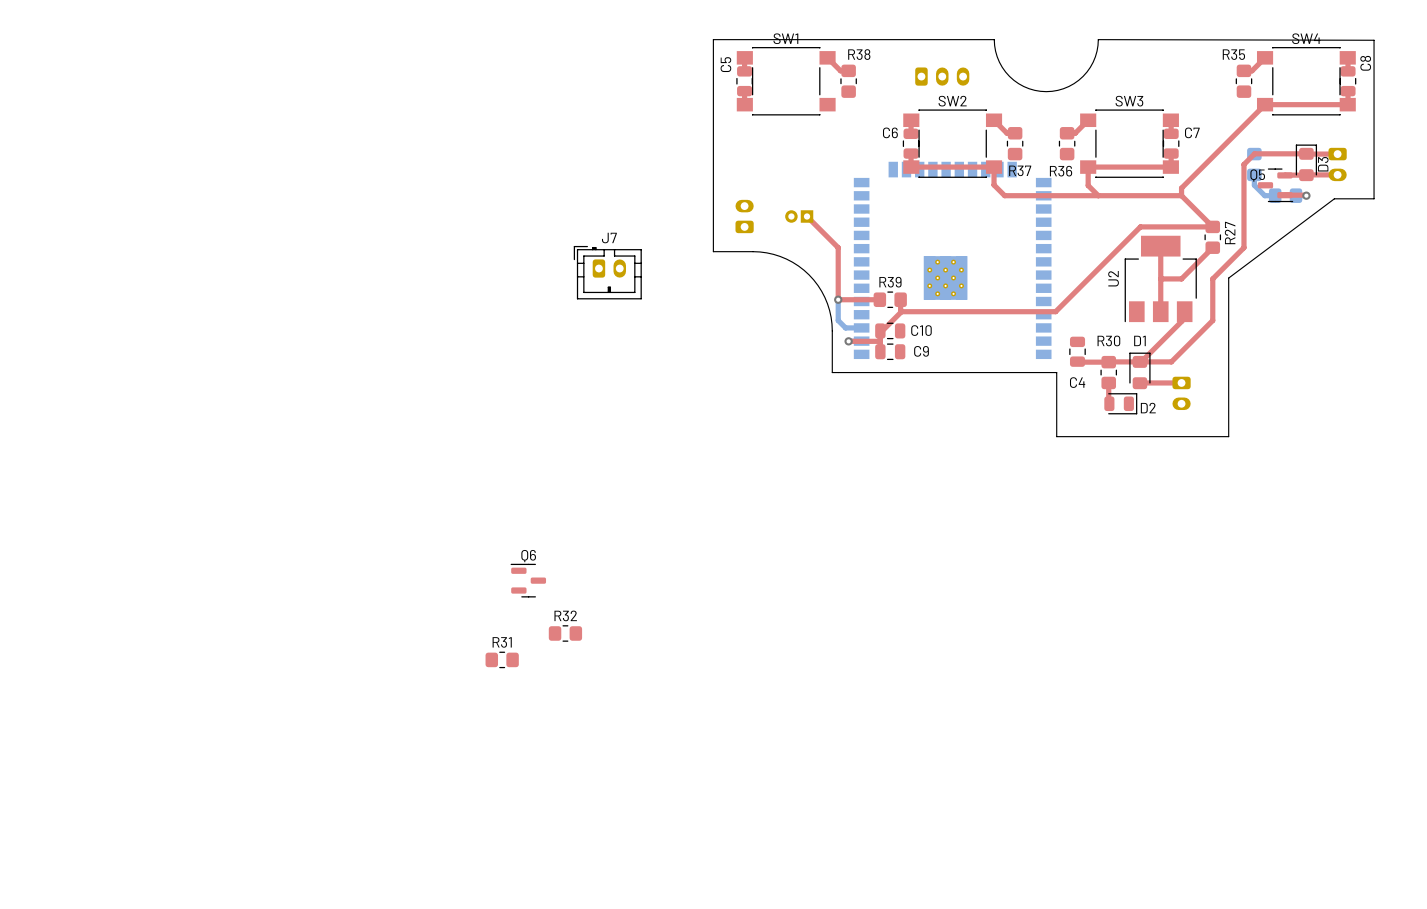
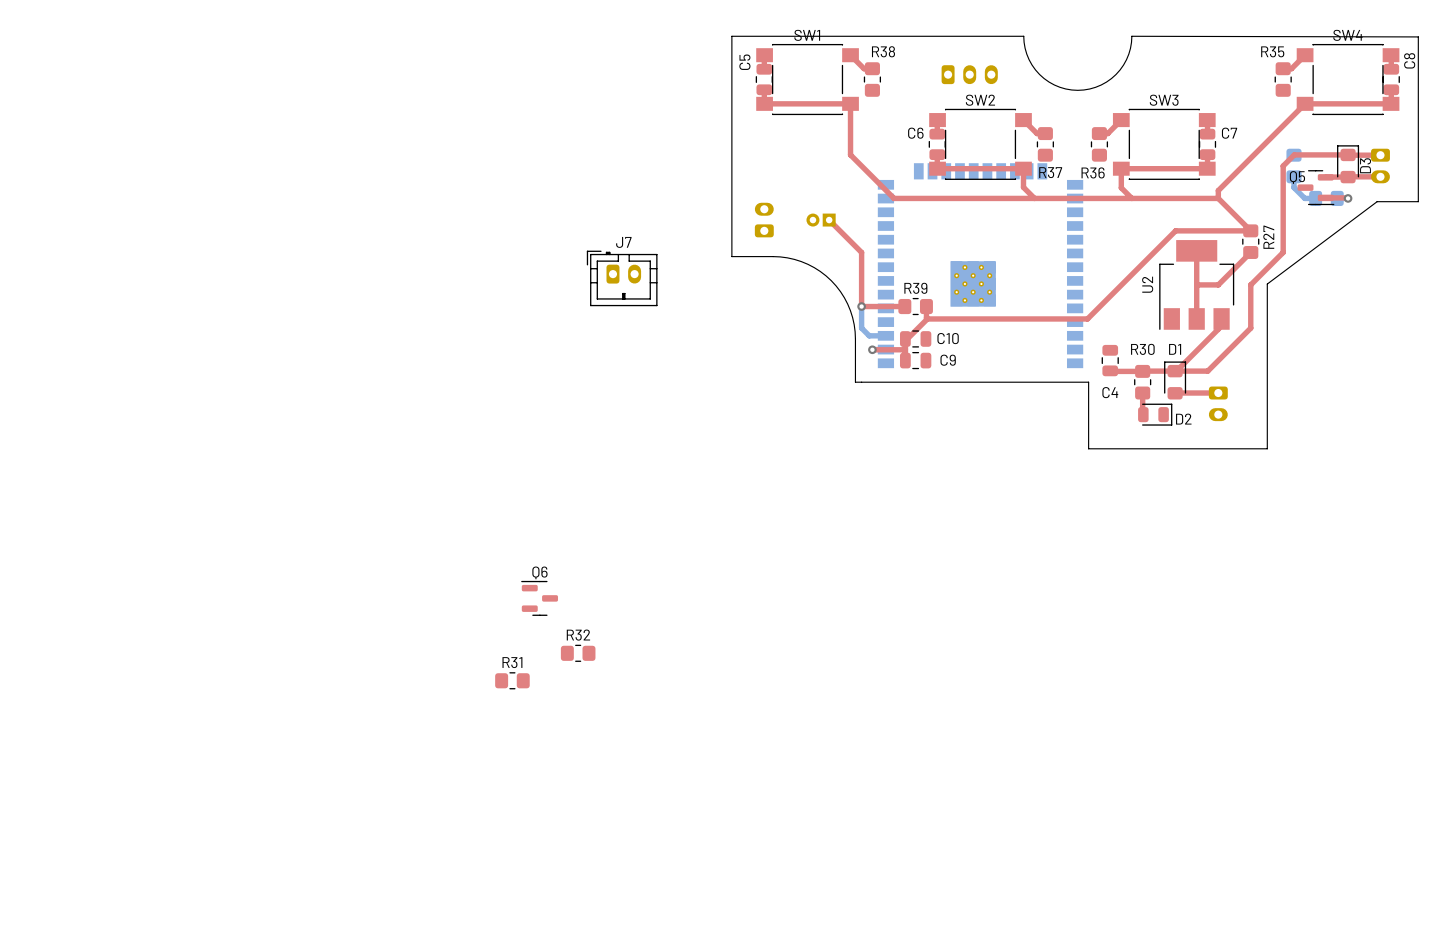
top track: none -> (764, 103) (850, 103) (850, 154) (894, 198) (1034, 198)

